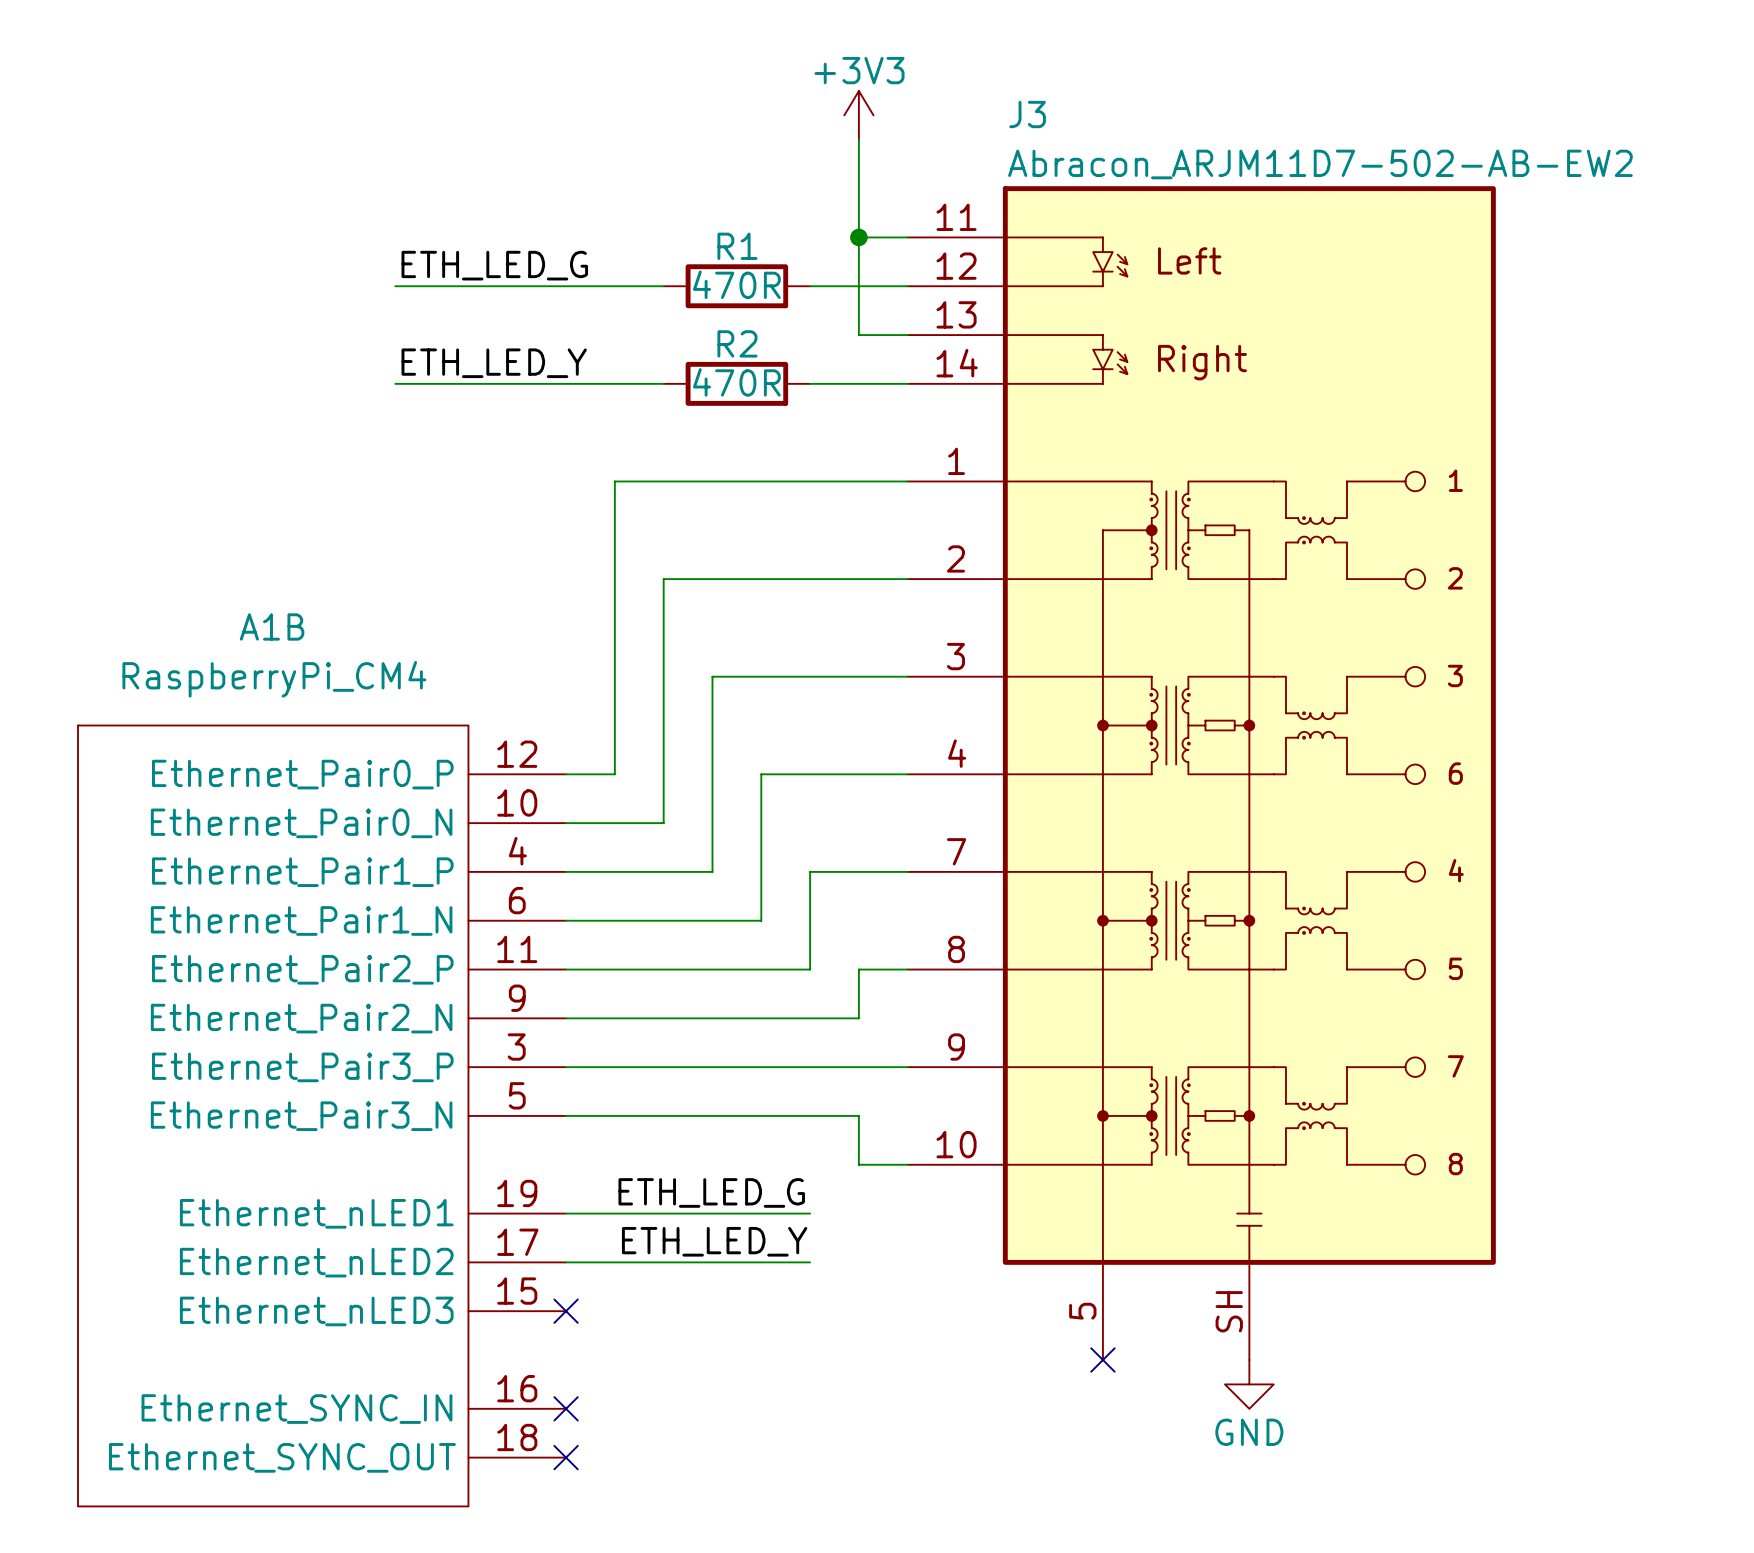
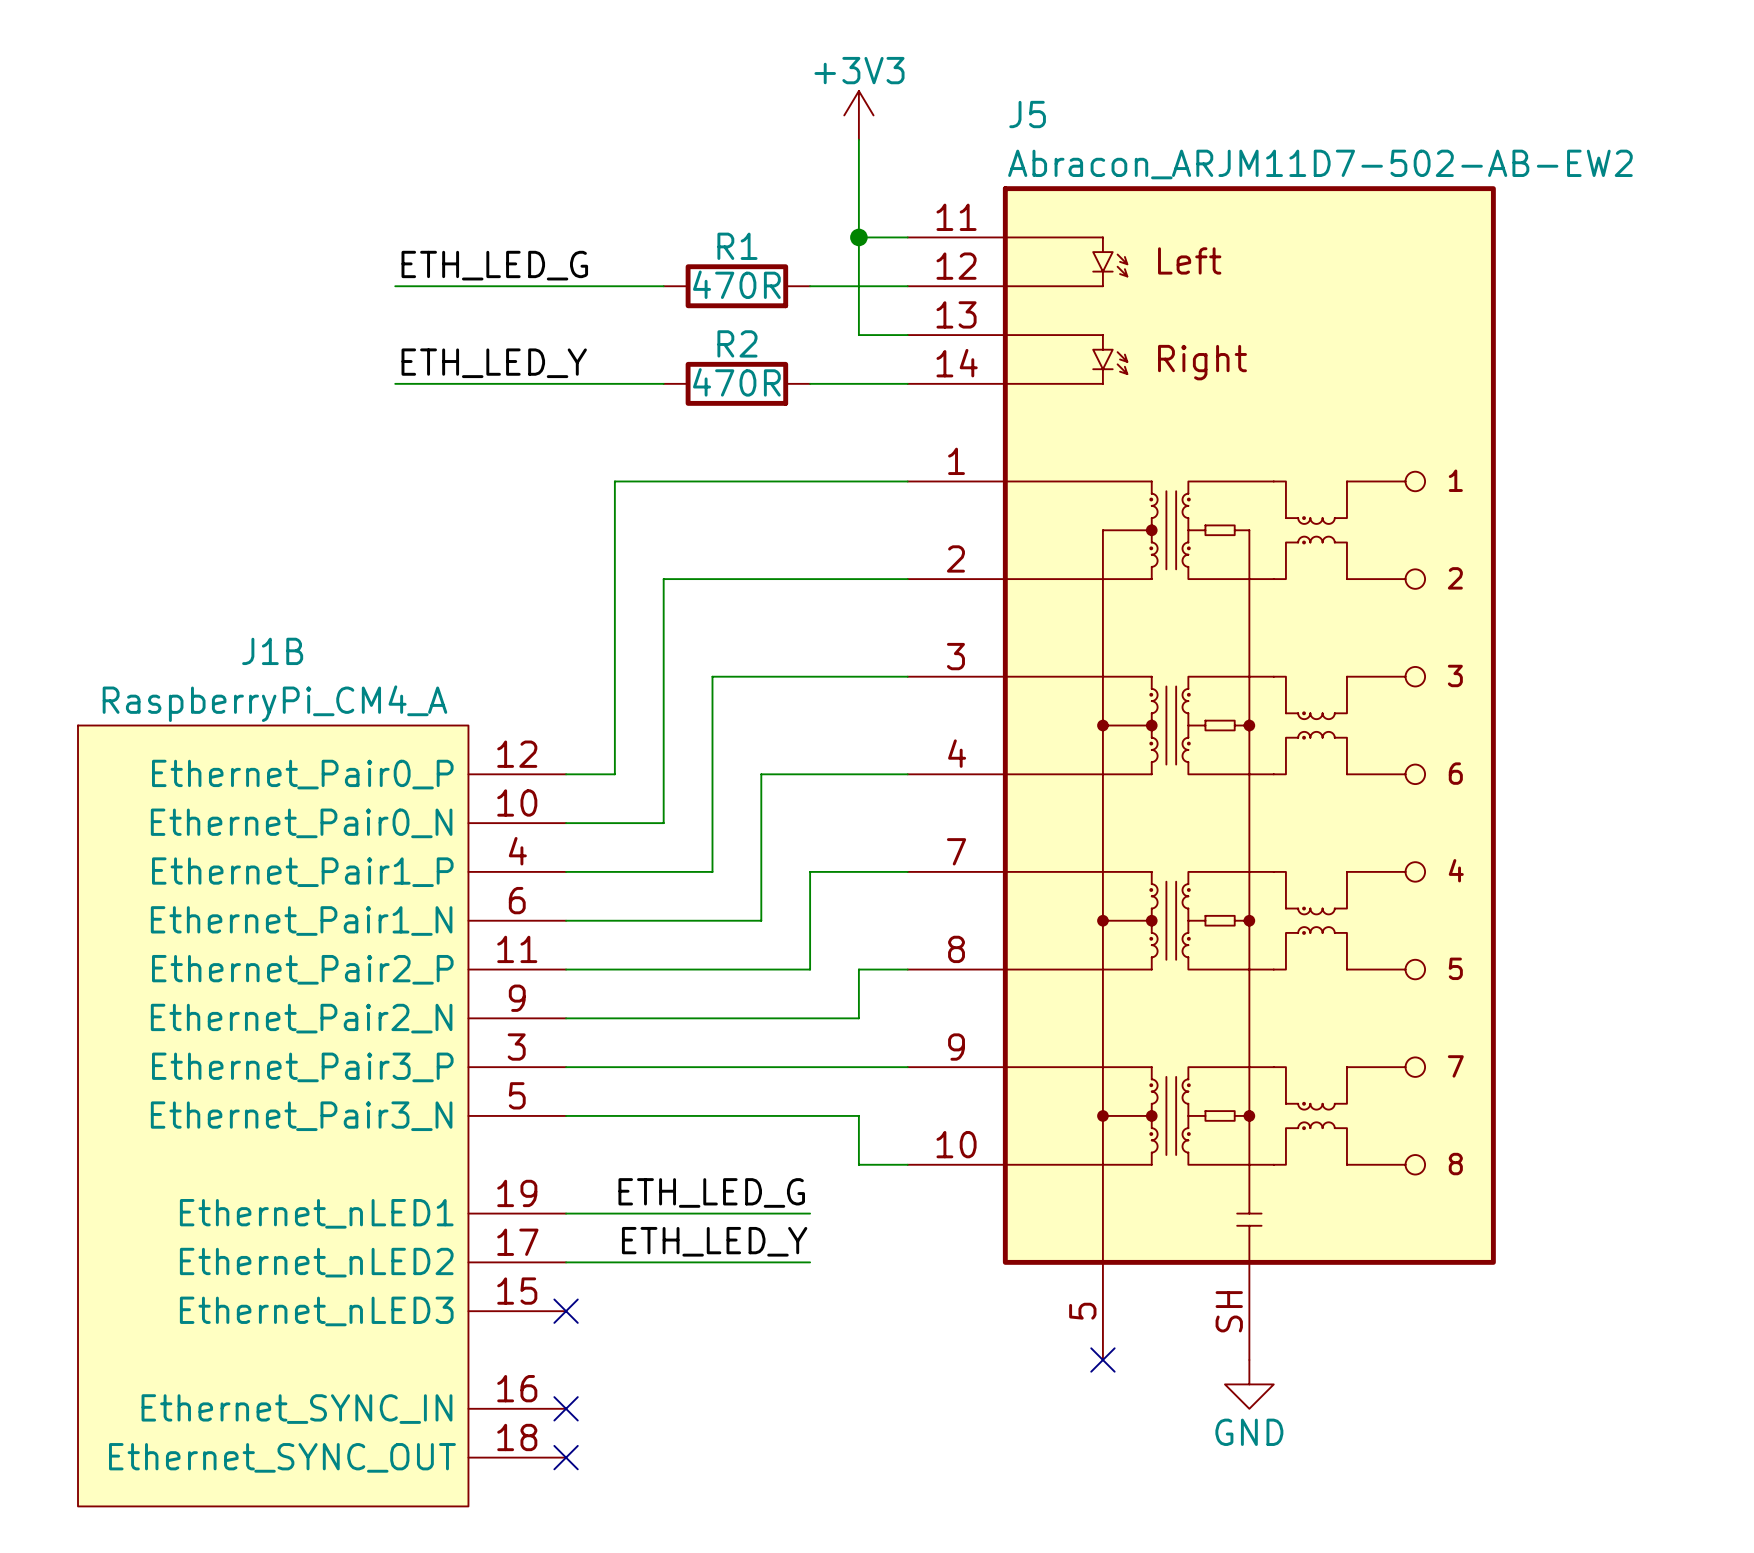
J3 name: J3 (1027, 114) -> J5 (1027, 114)
A1B: RaspberryPi_CM4 (322, 1115) -> none
J1B: none -> RaspberryPi_CM4_A (322, 1115)

